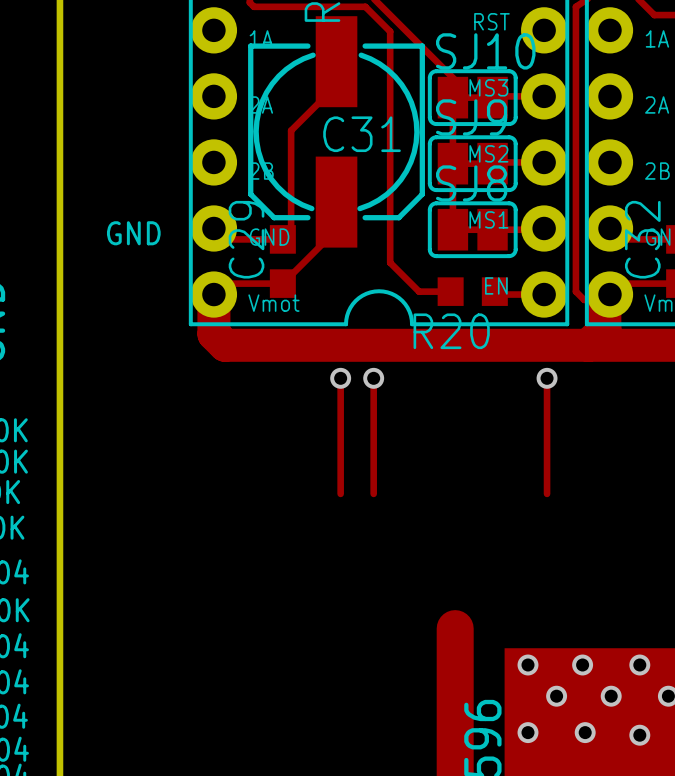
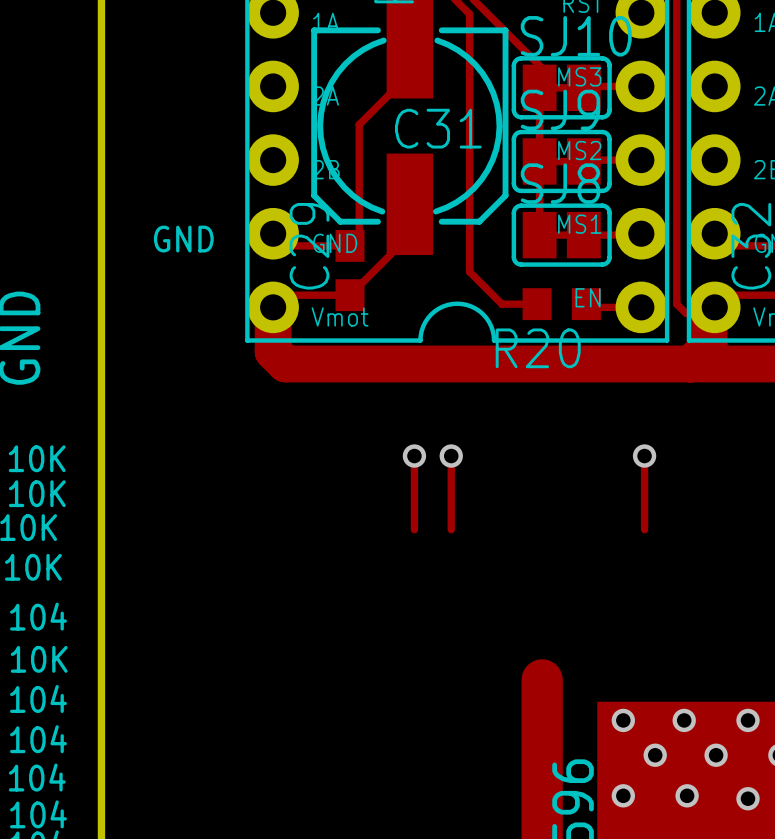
track: (340, 378) (340, 427) -> none
via: (340, 378) -> none
track: (373, 378) (373, 427) -> none
via: (373, 378) -> none
track: (547, 378) (547, 427) -> none
via position: (547, 378) -> (644, 456)
via: none -> (414, 456)
via: none -> (451, 456)

